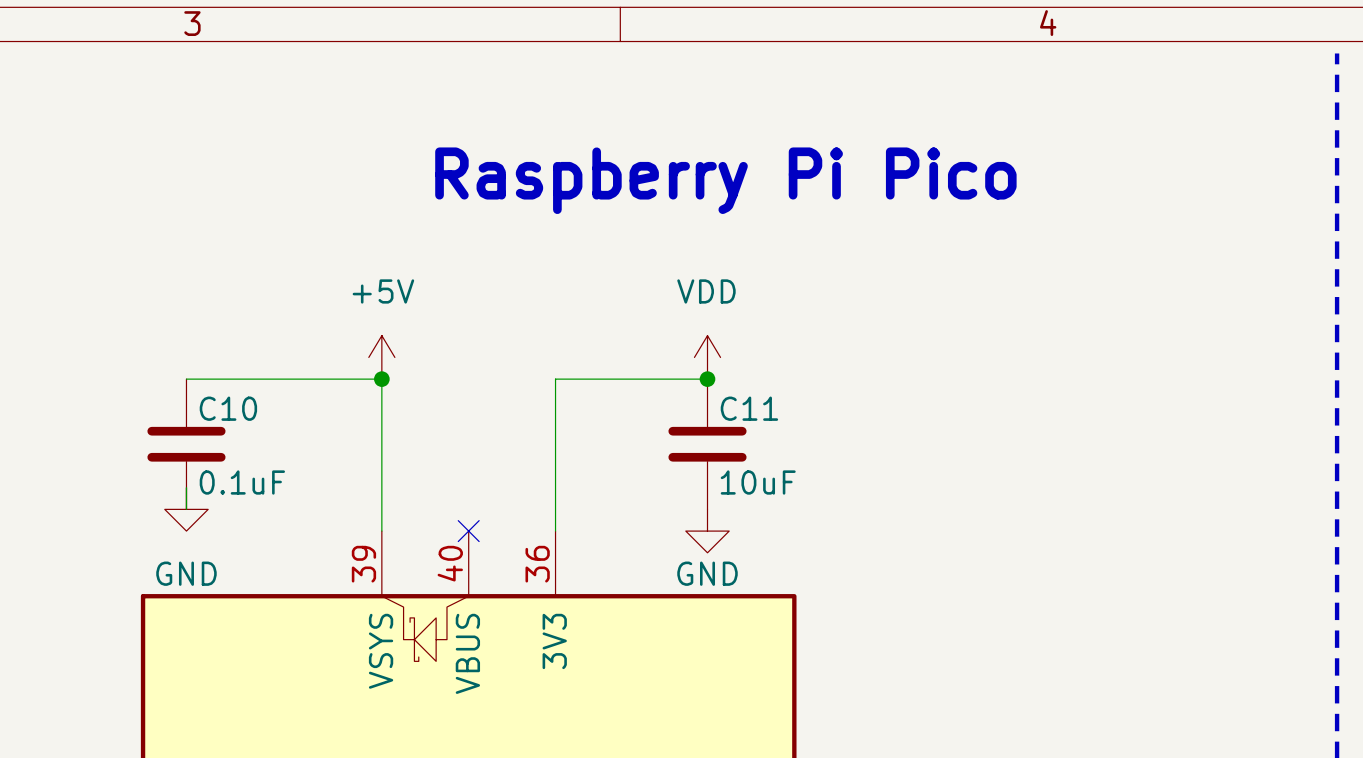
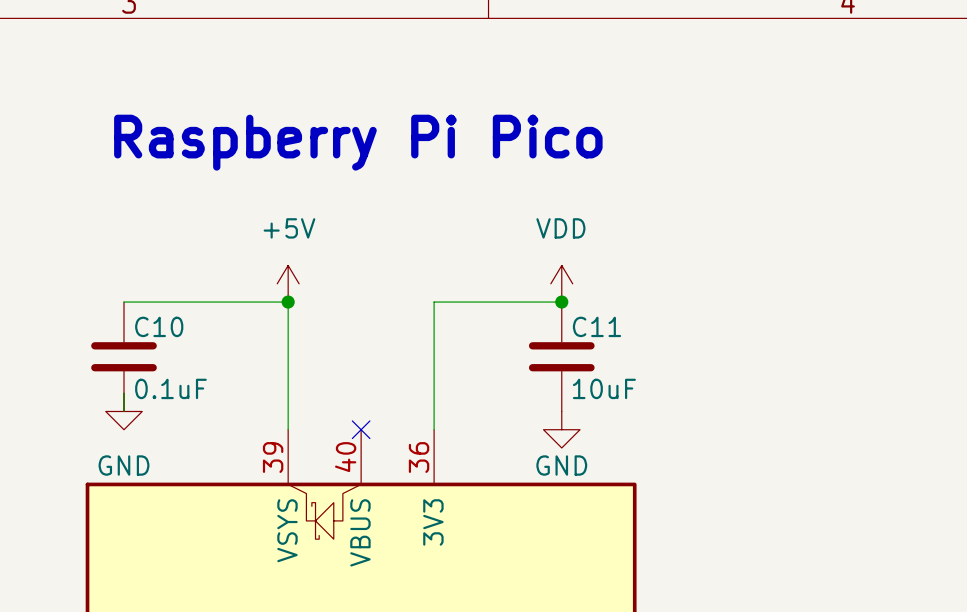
text position: Raspberry Pi Pico (725, 180) -> Raspberry Pi Pico (358, 142)

